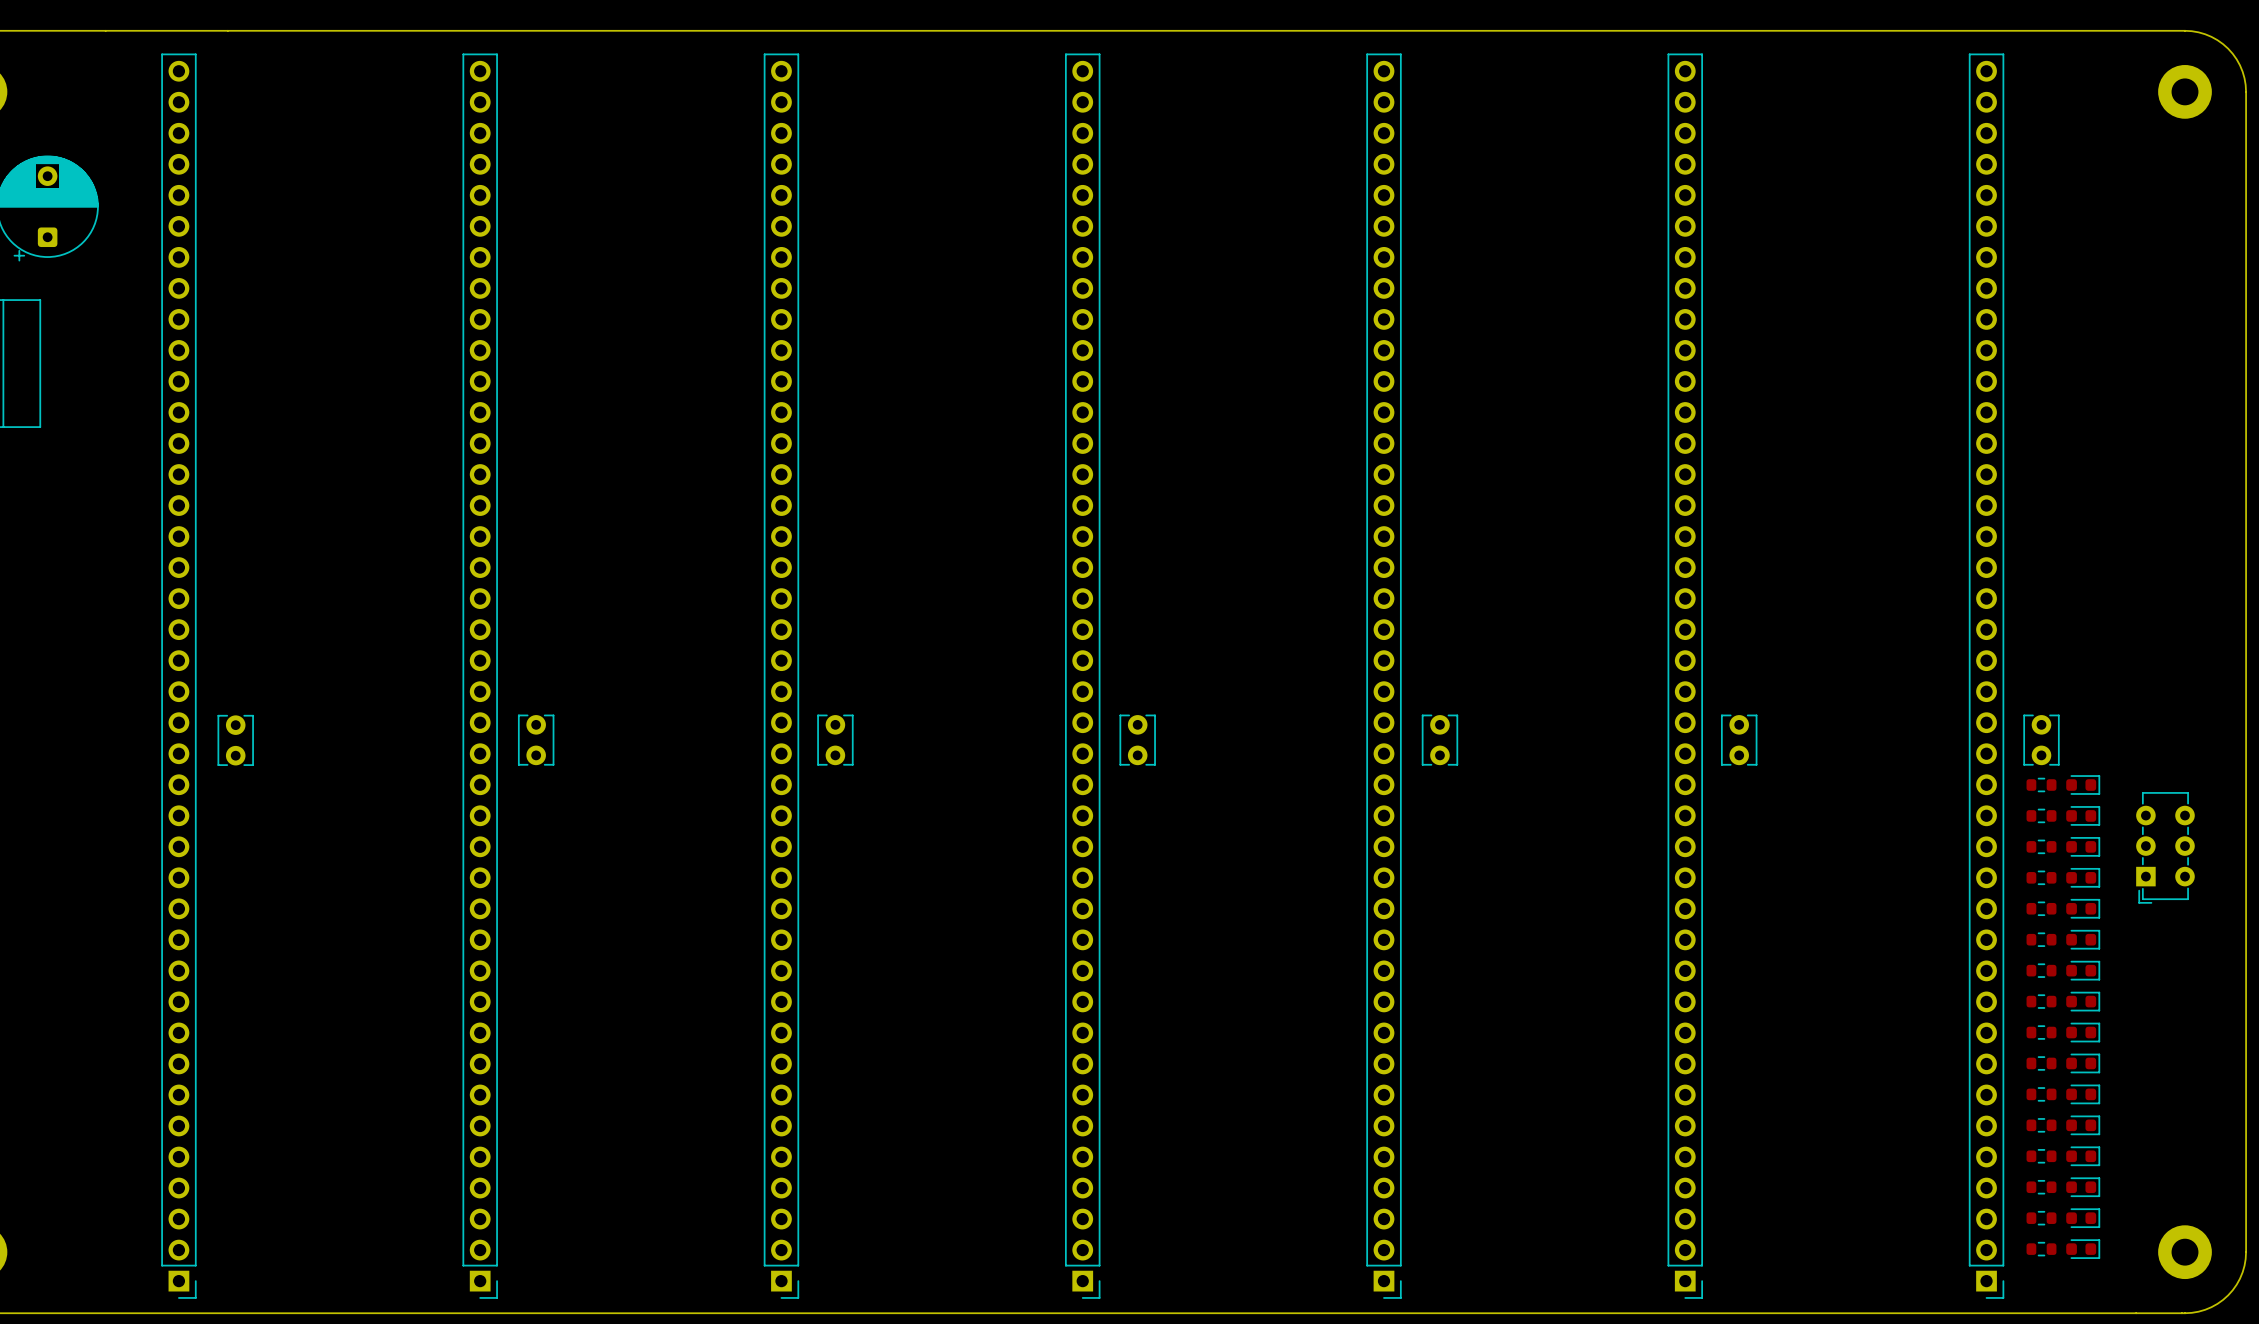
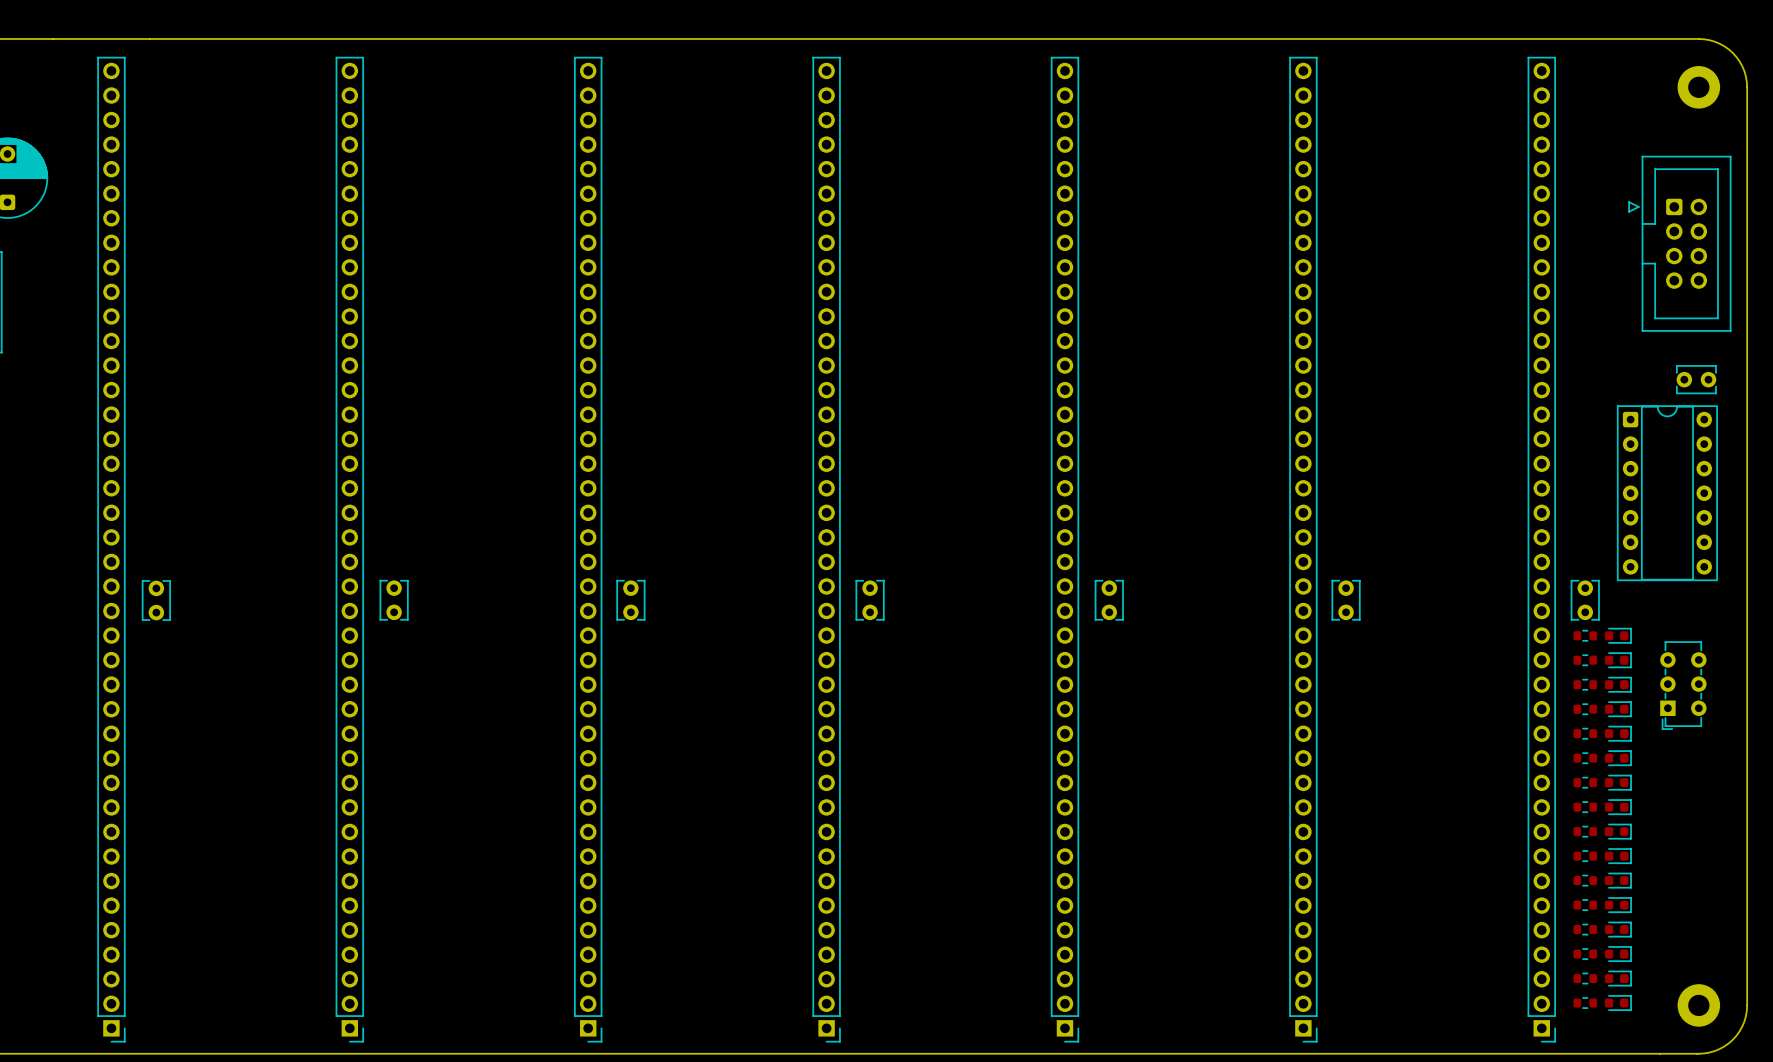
part: none -> (1679, 243)
part: none -> (1696, 379)
part: none -> (1667, 493)

